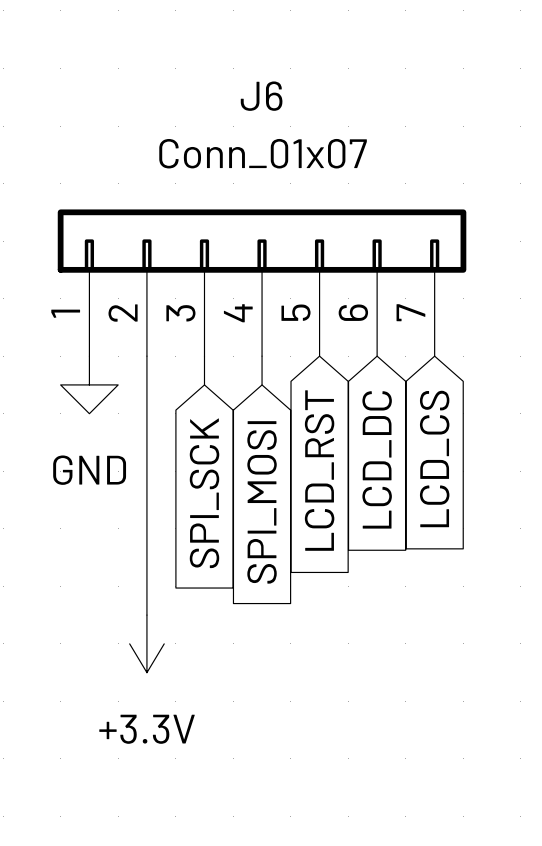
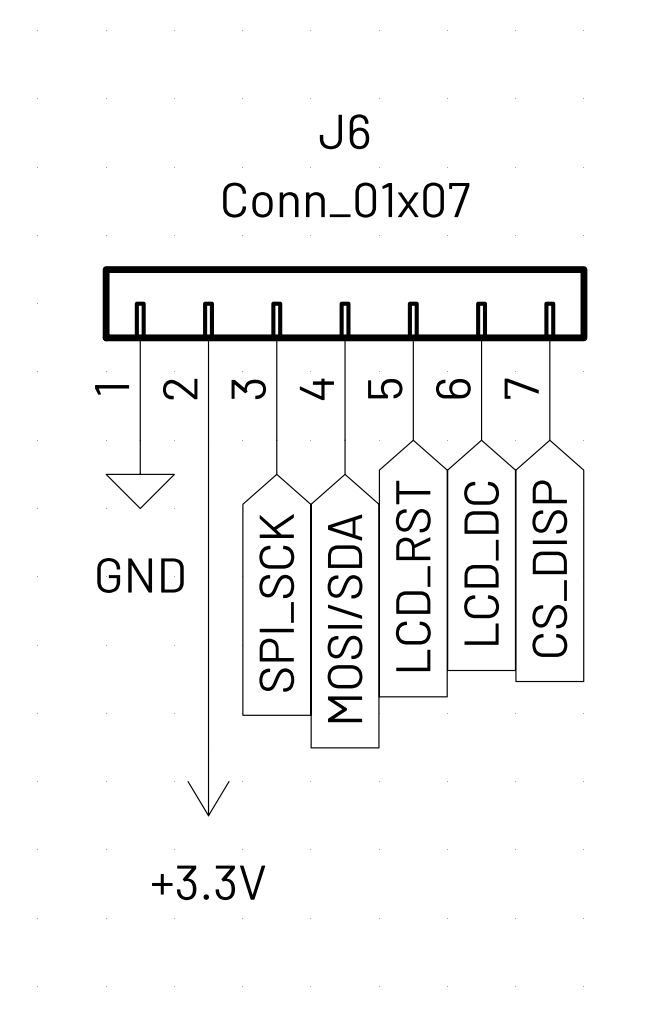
global label: LCD_CS (434, 458) -> CS_DISP (549, 568)
global label: SPI_MOSI (262, 502) -> MOSI/SDA (345, 618)

